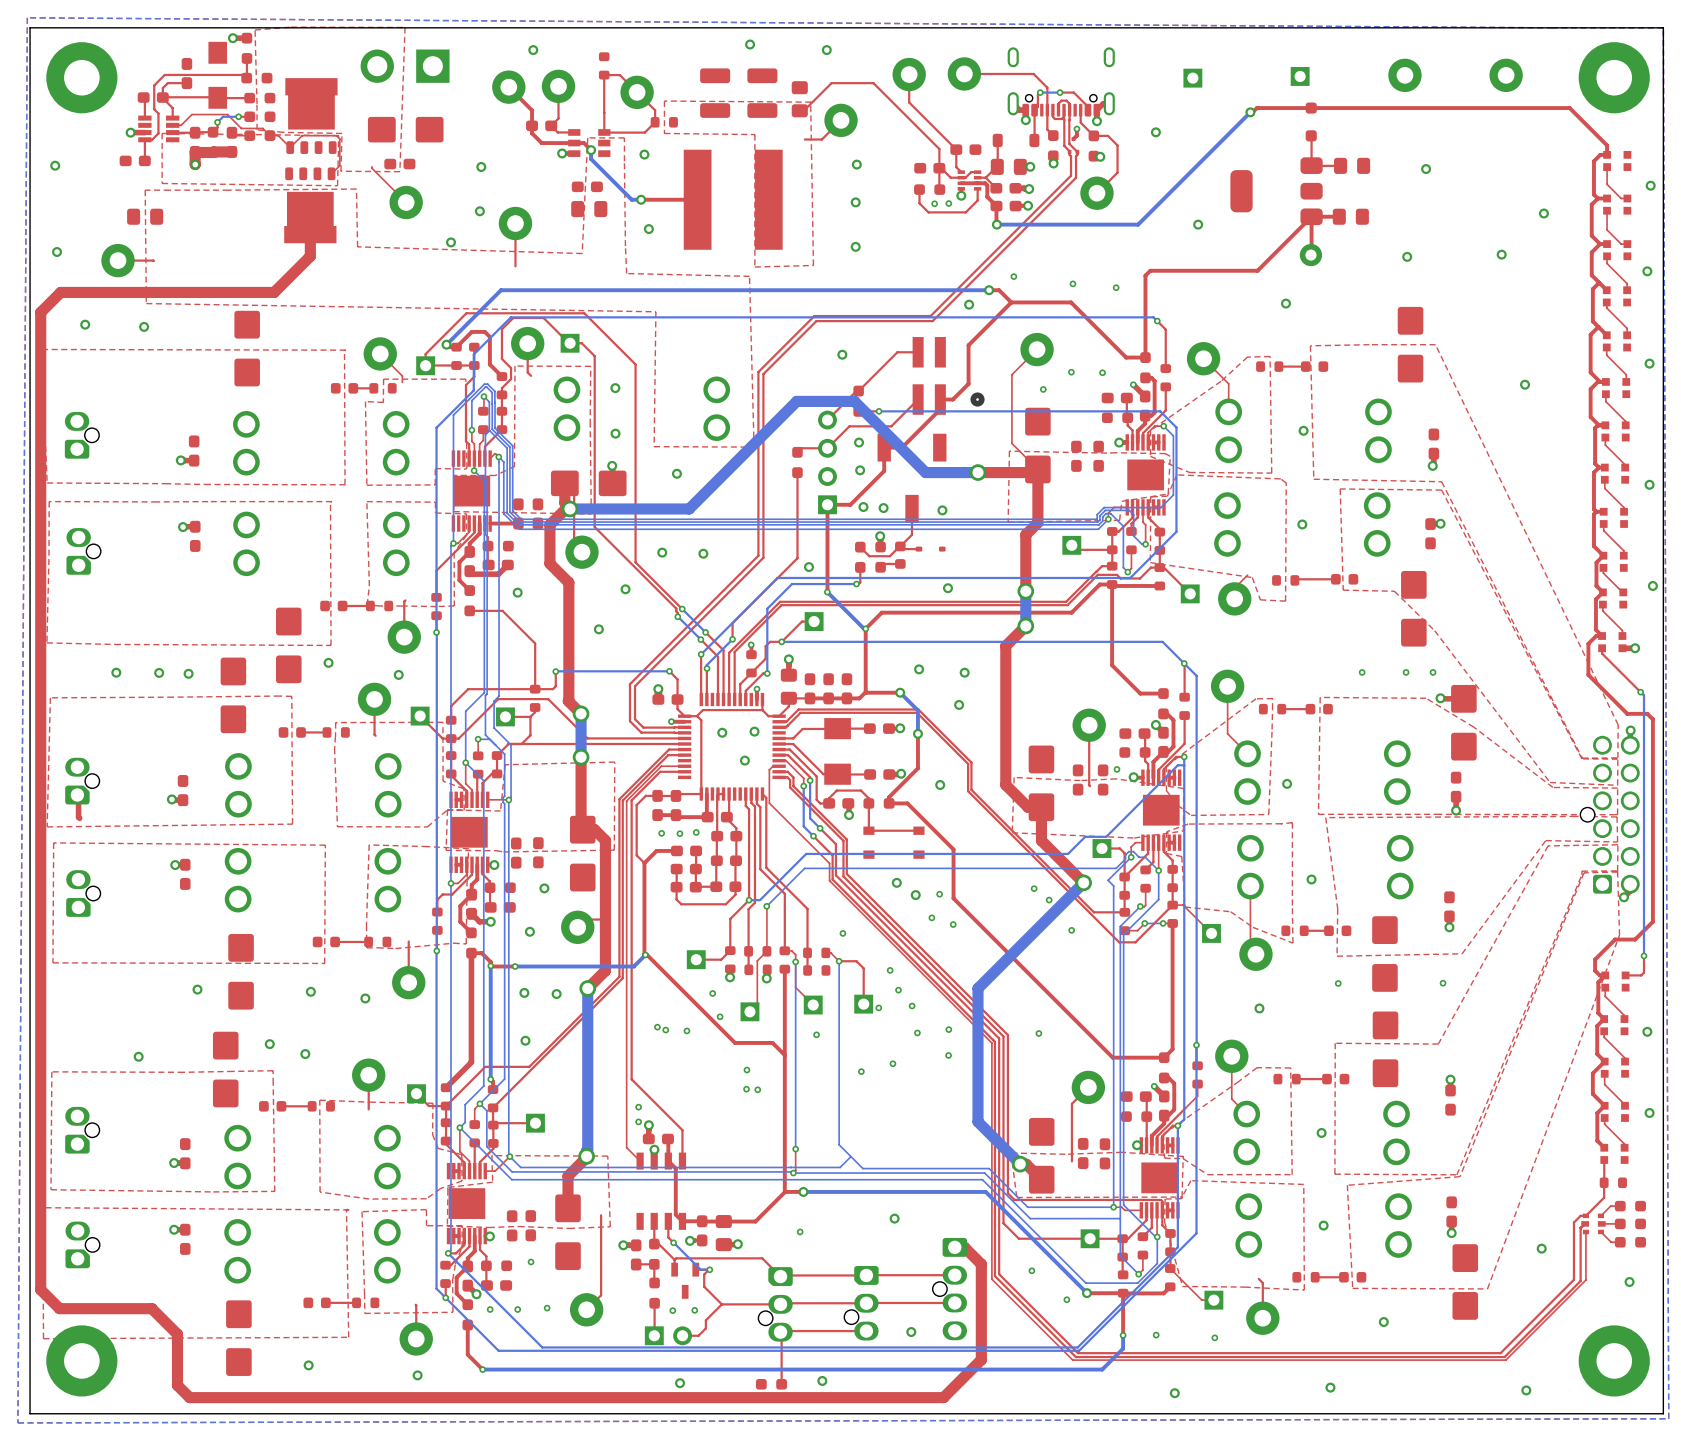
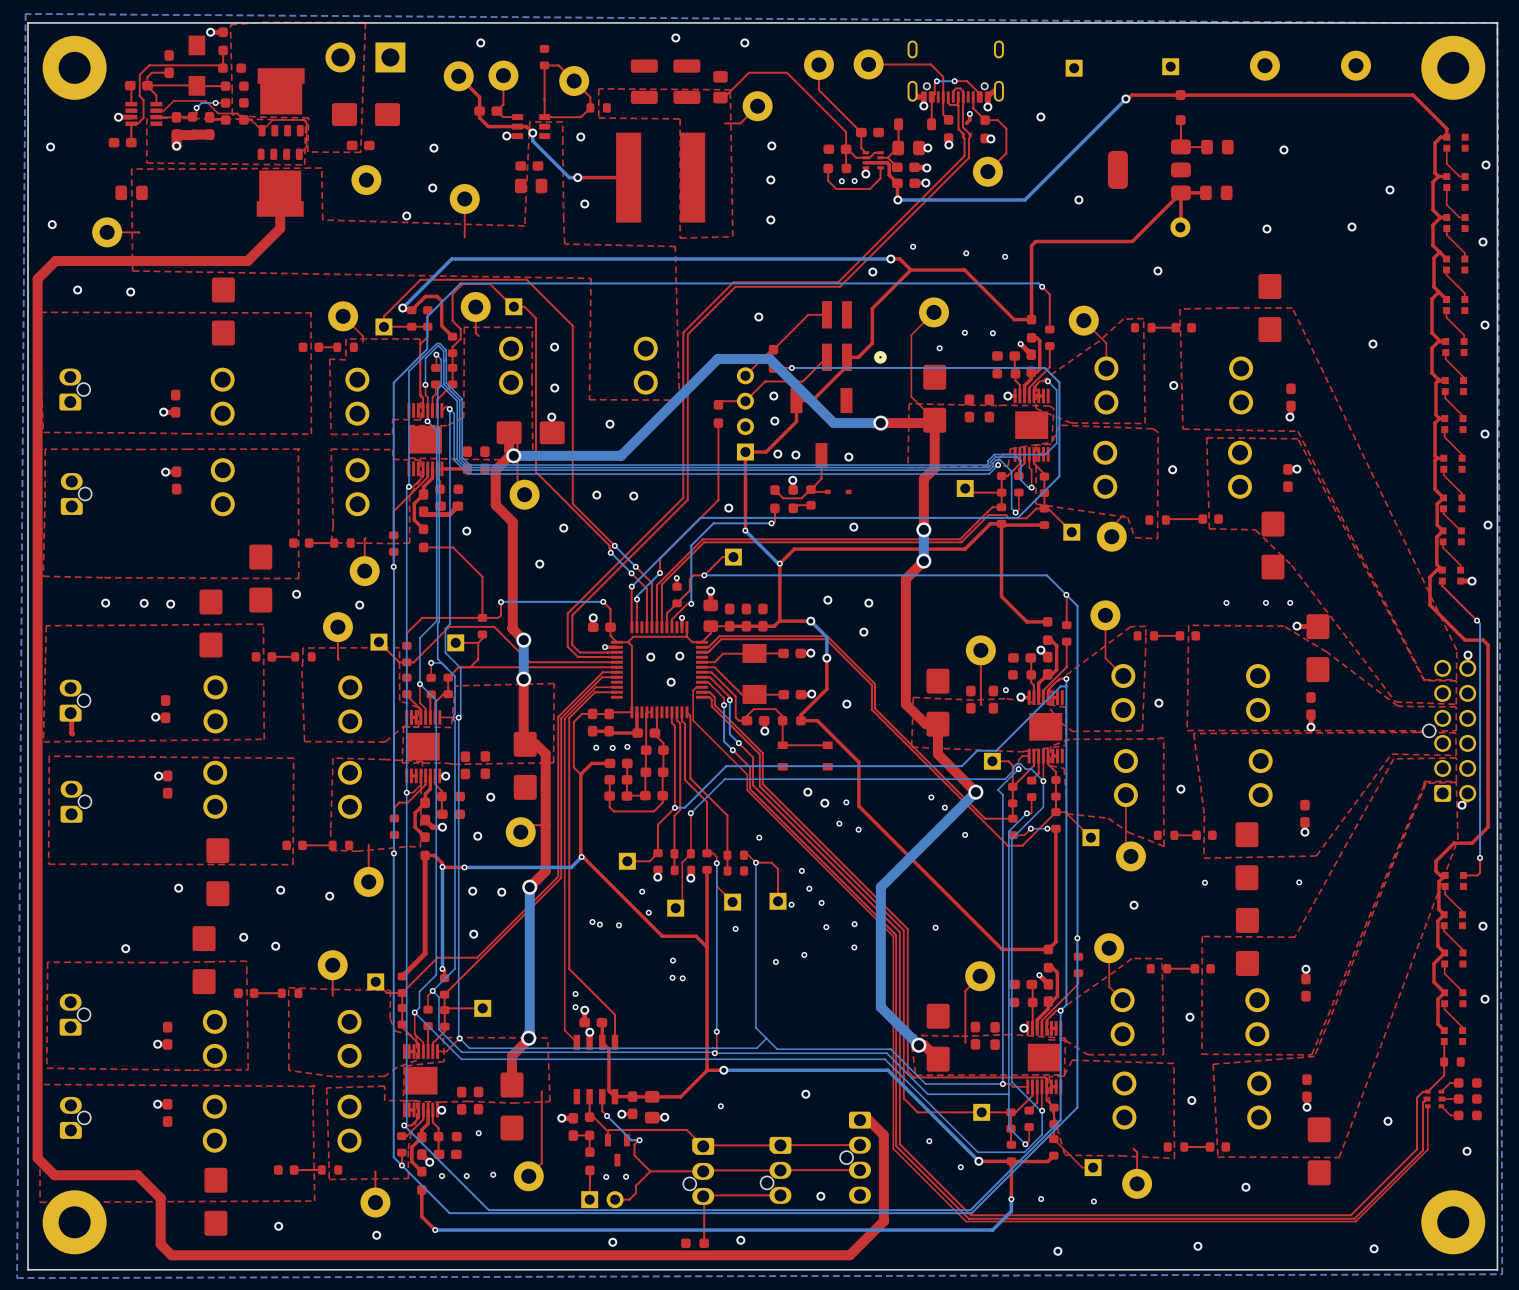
top track: (372, 166) (406, 202) -> none

